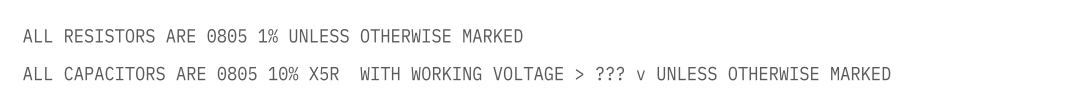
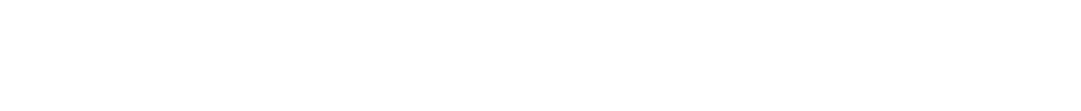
text: ALL RESISTORS ARE 0805 1% UNLESS OTHERWISE MARKED (272, 35) -> none
text: ALL CAPACITORS ARE 0805 10% X5R WITH WORKING VOLTAGE > ??? v UNLESS OTHERWISE MARKED (456, 73) -> none

